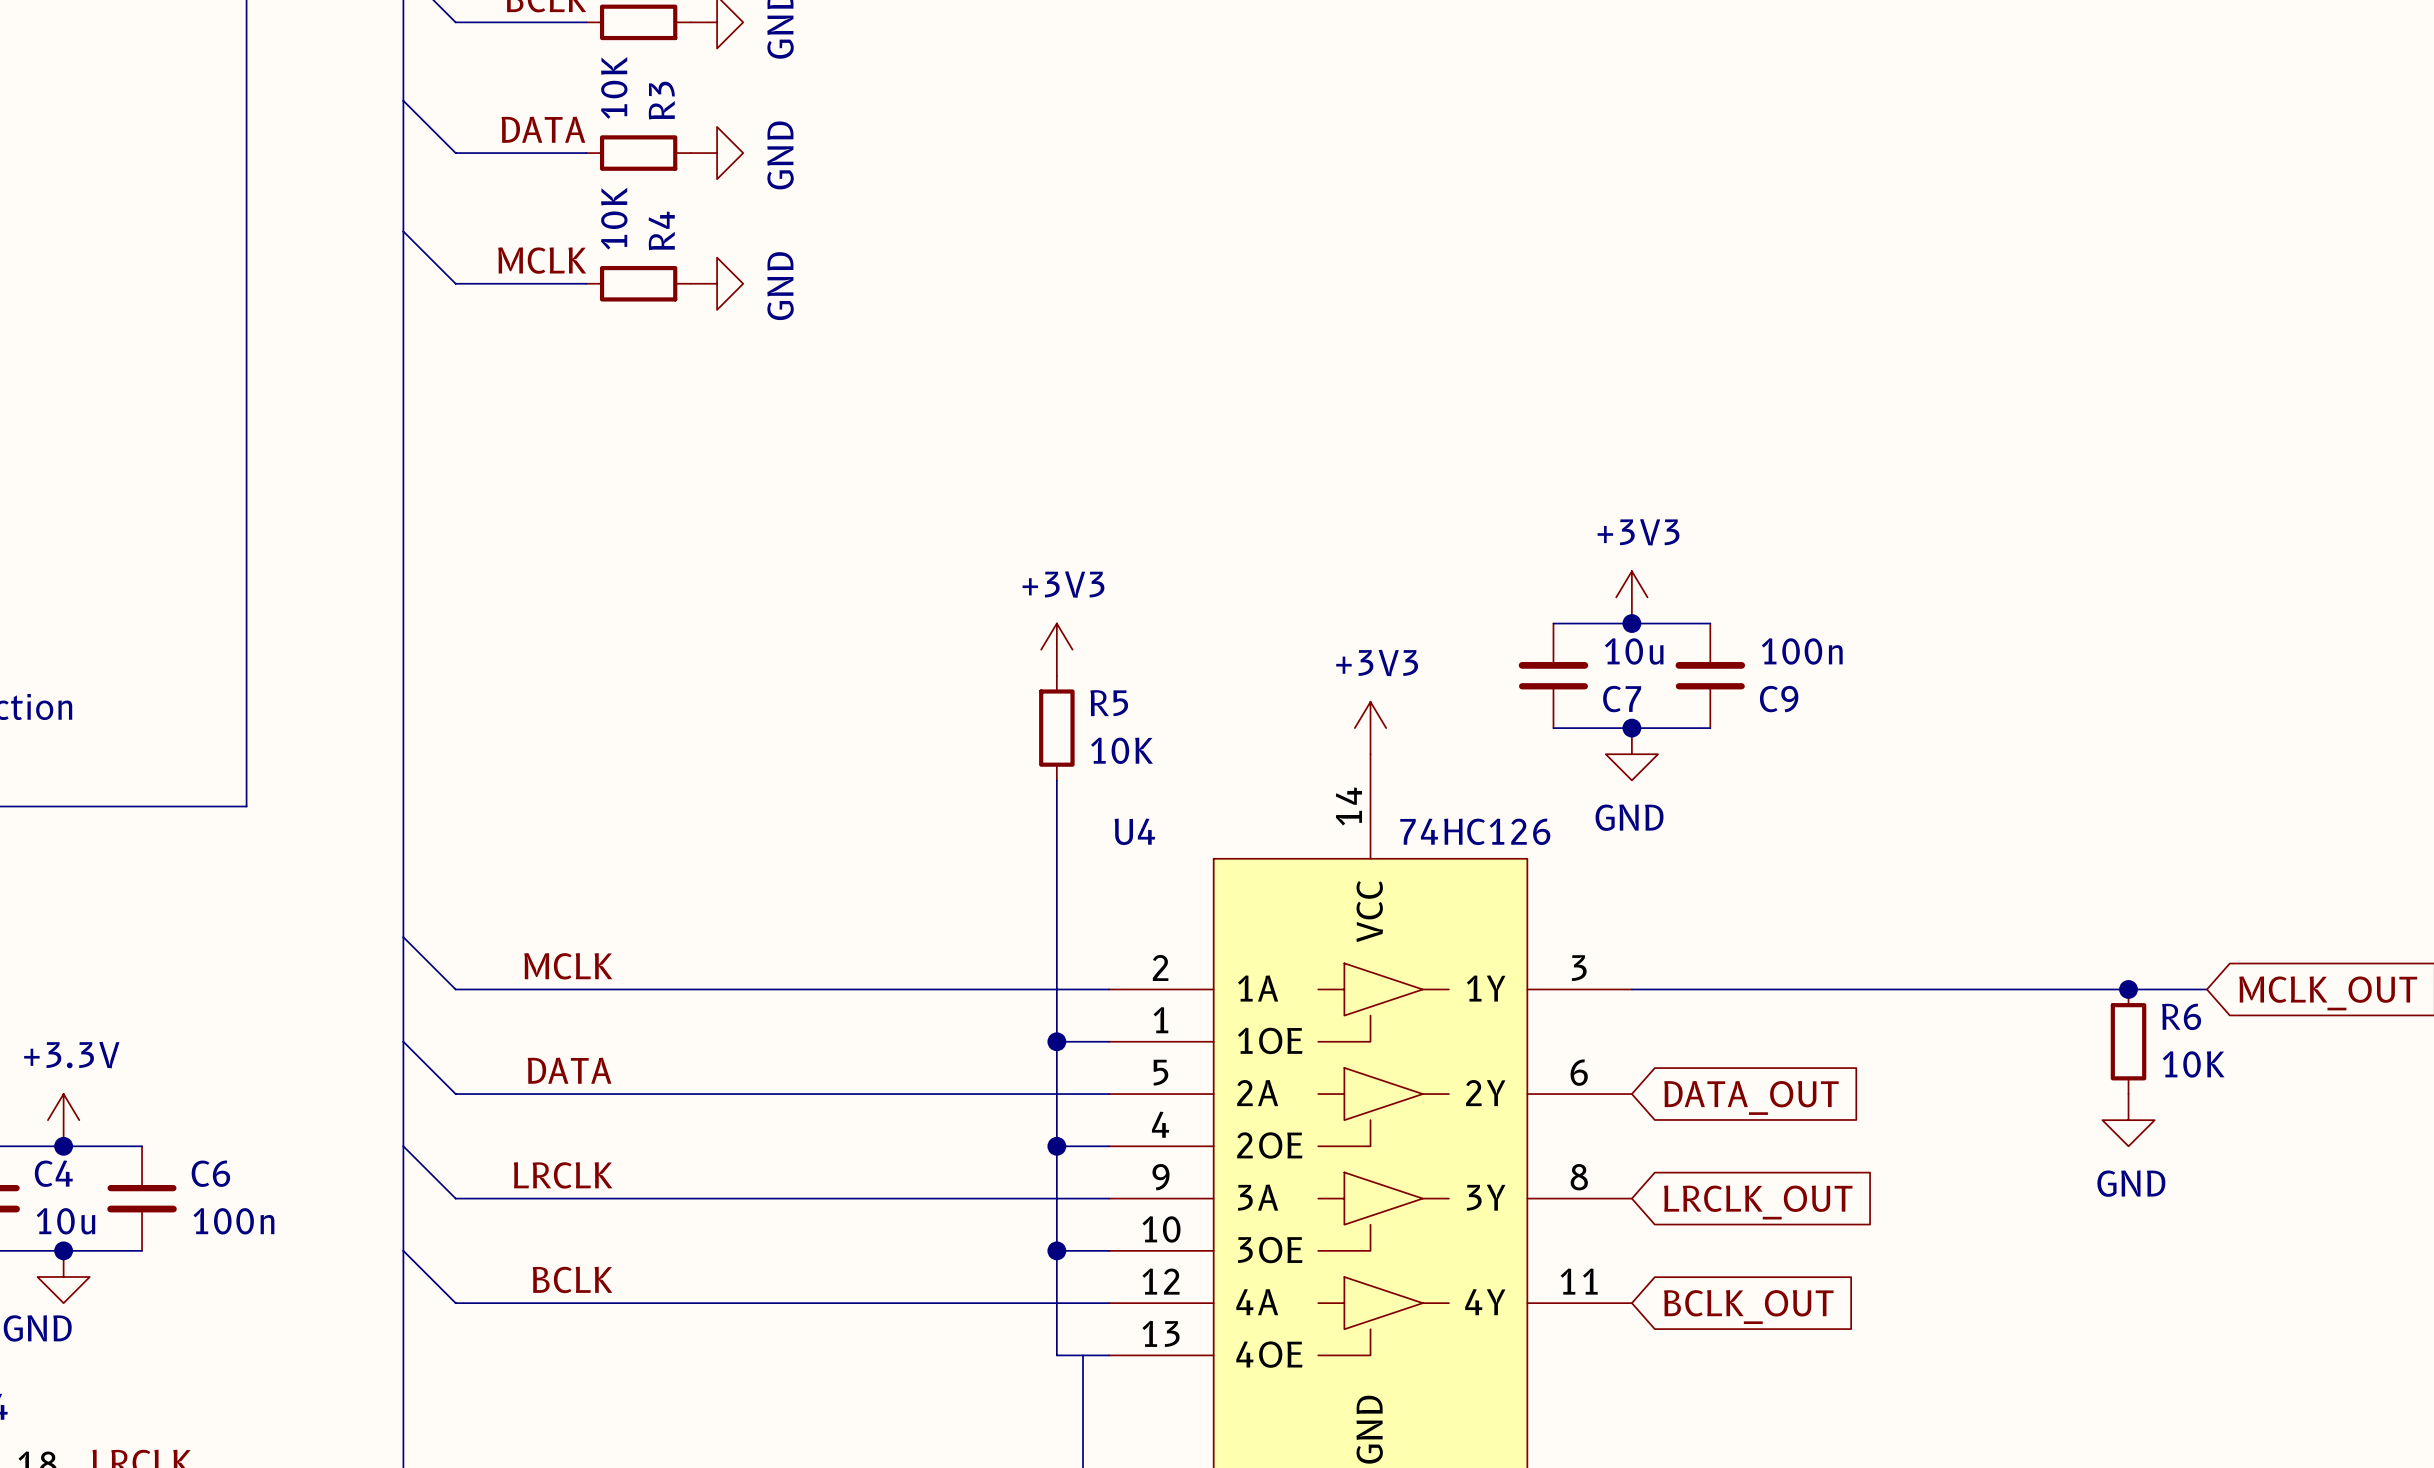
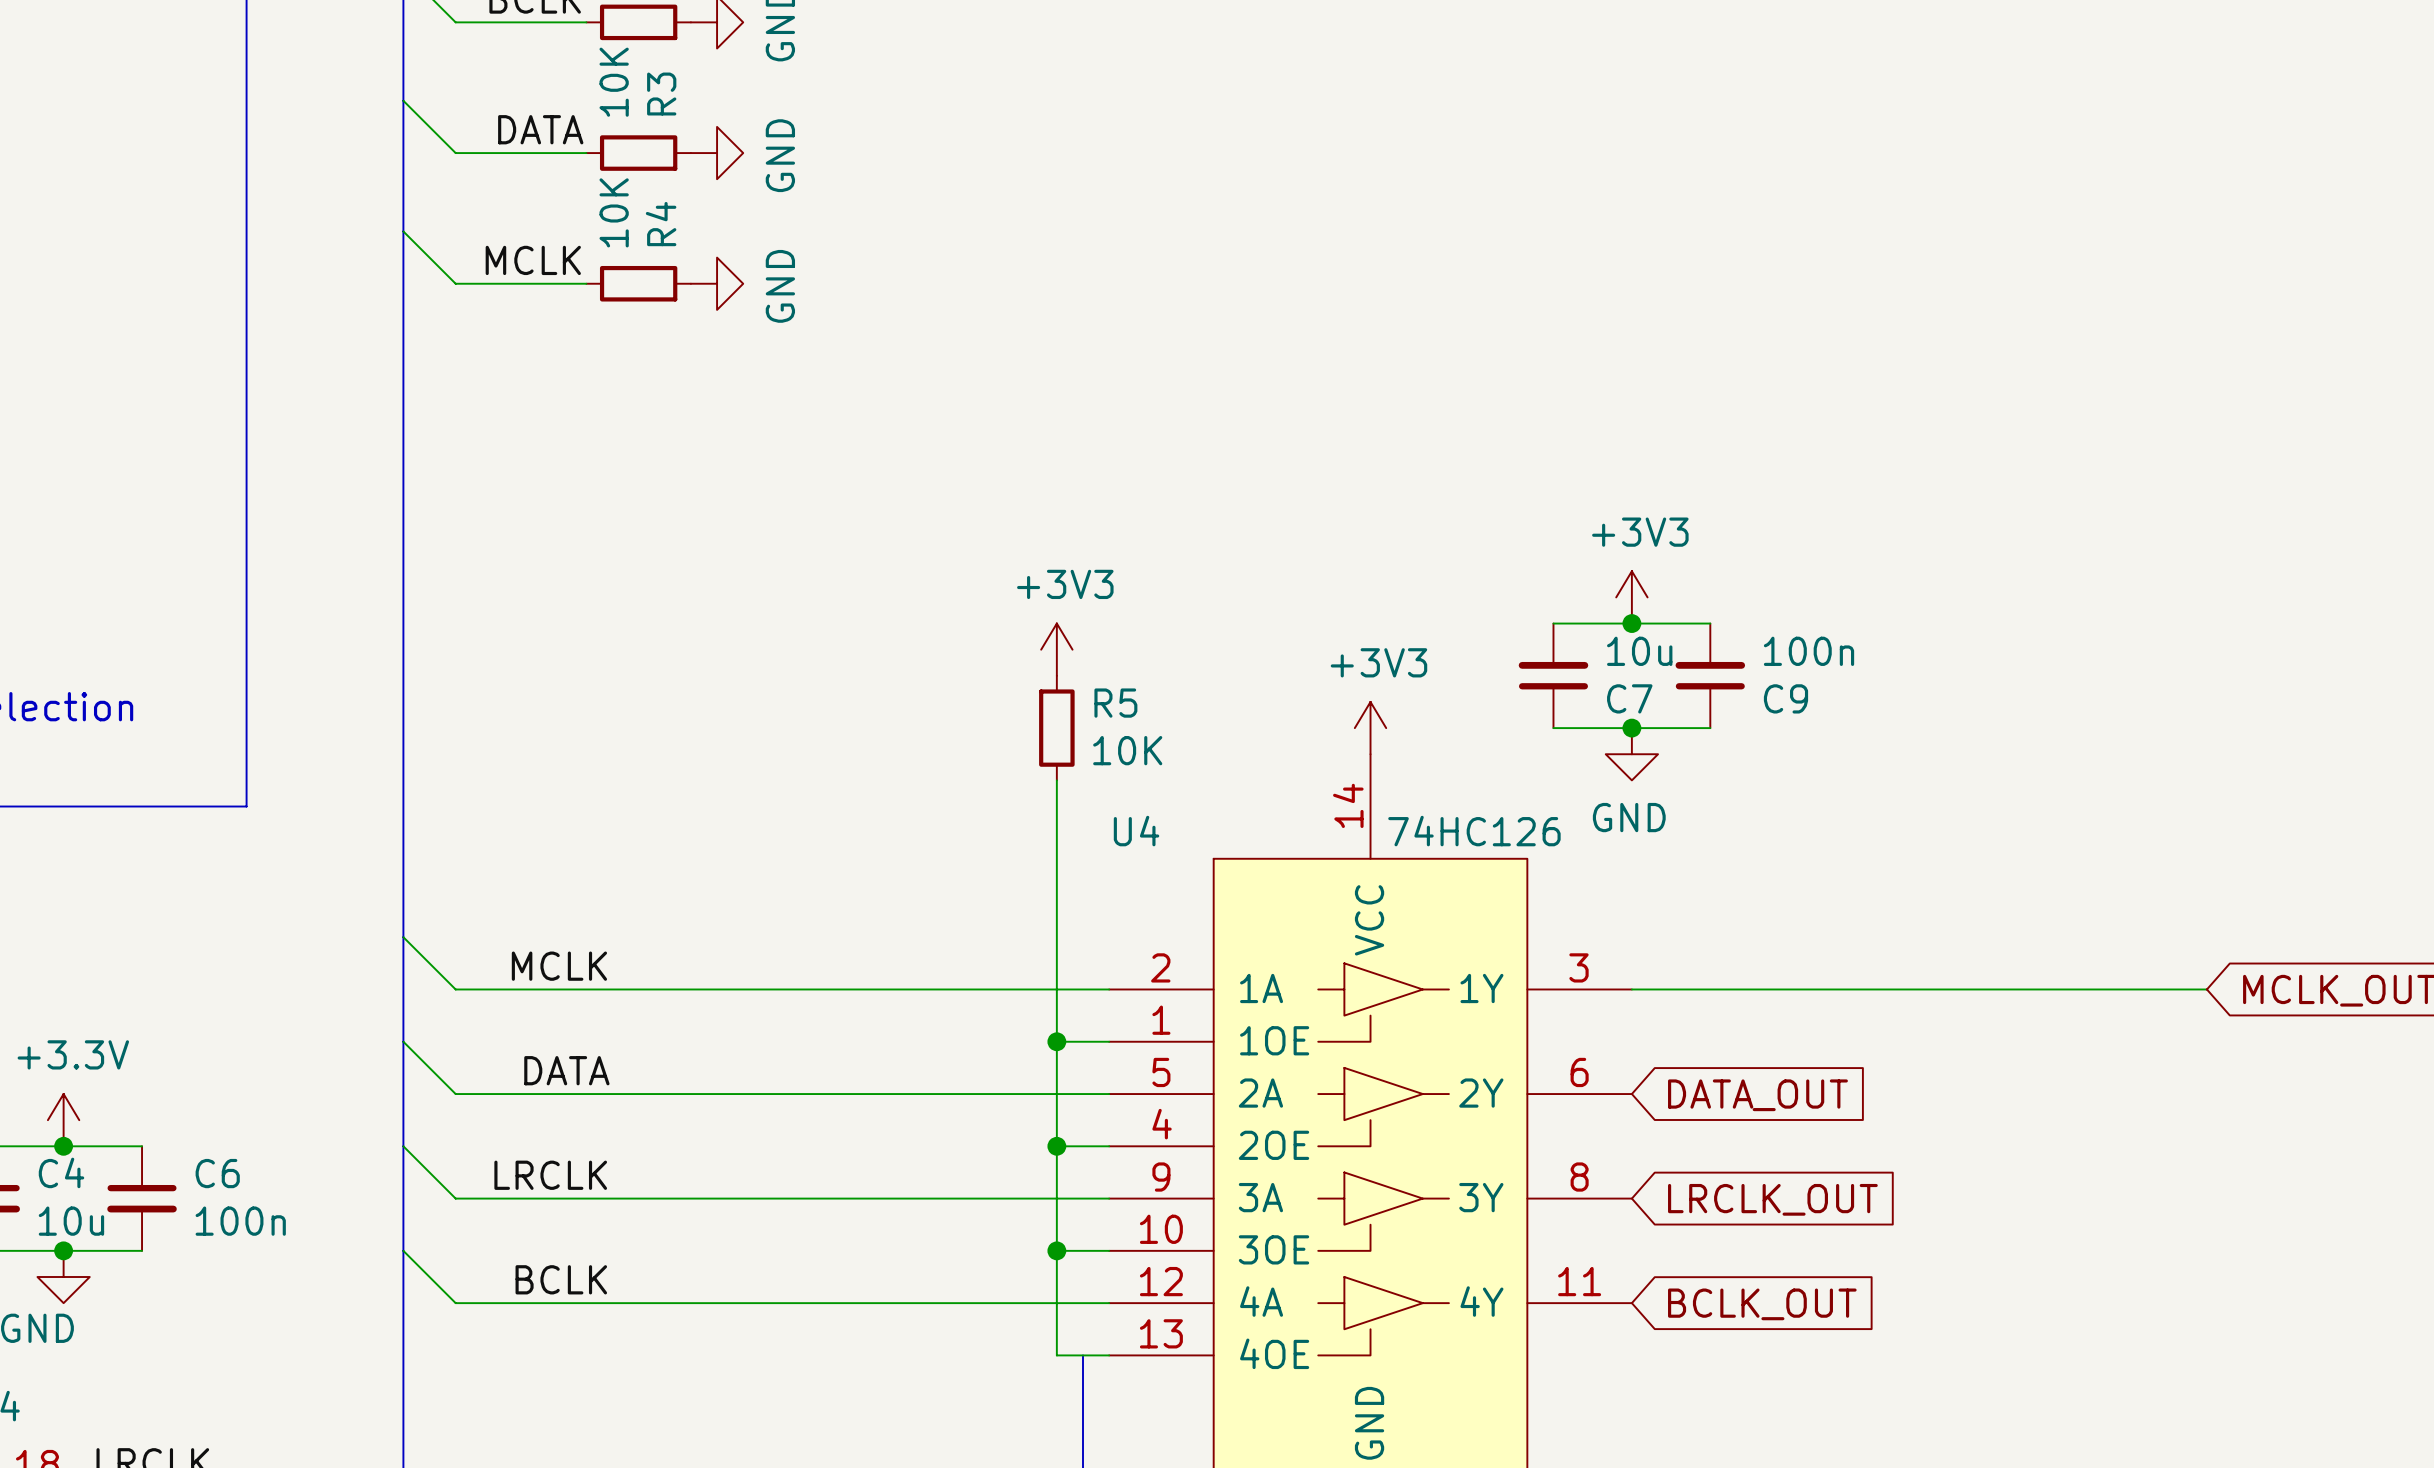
junction: (2128, 989) -> none
R6: 10K (2128, 1041) -> none
power symbol: GND (2128, 1120) -> none

